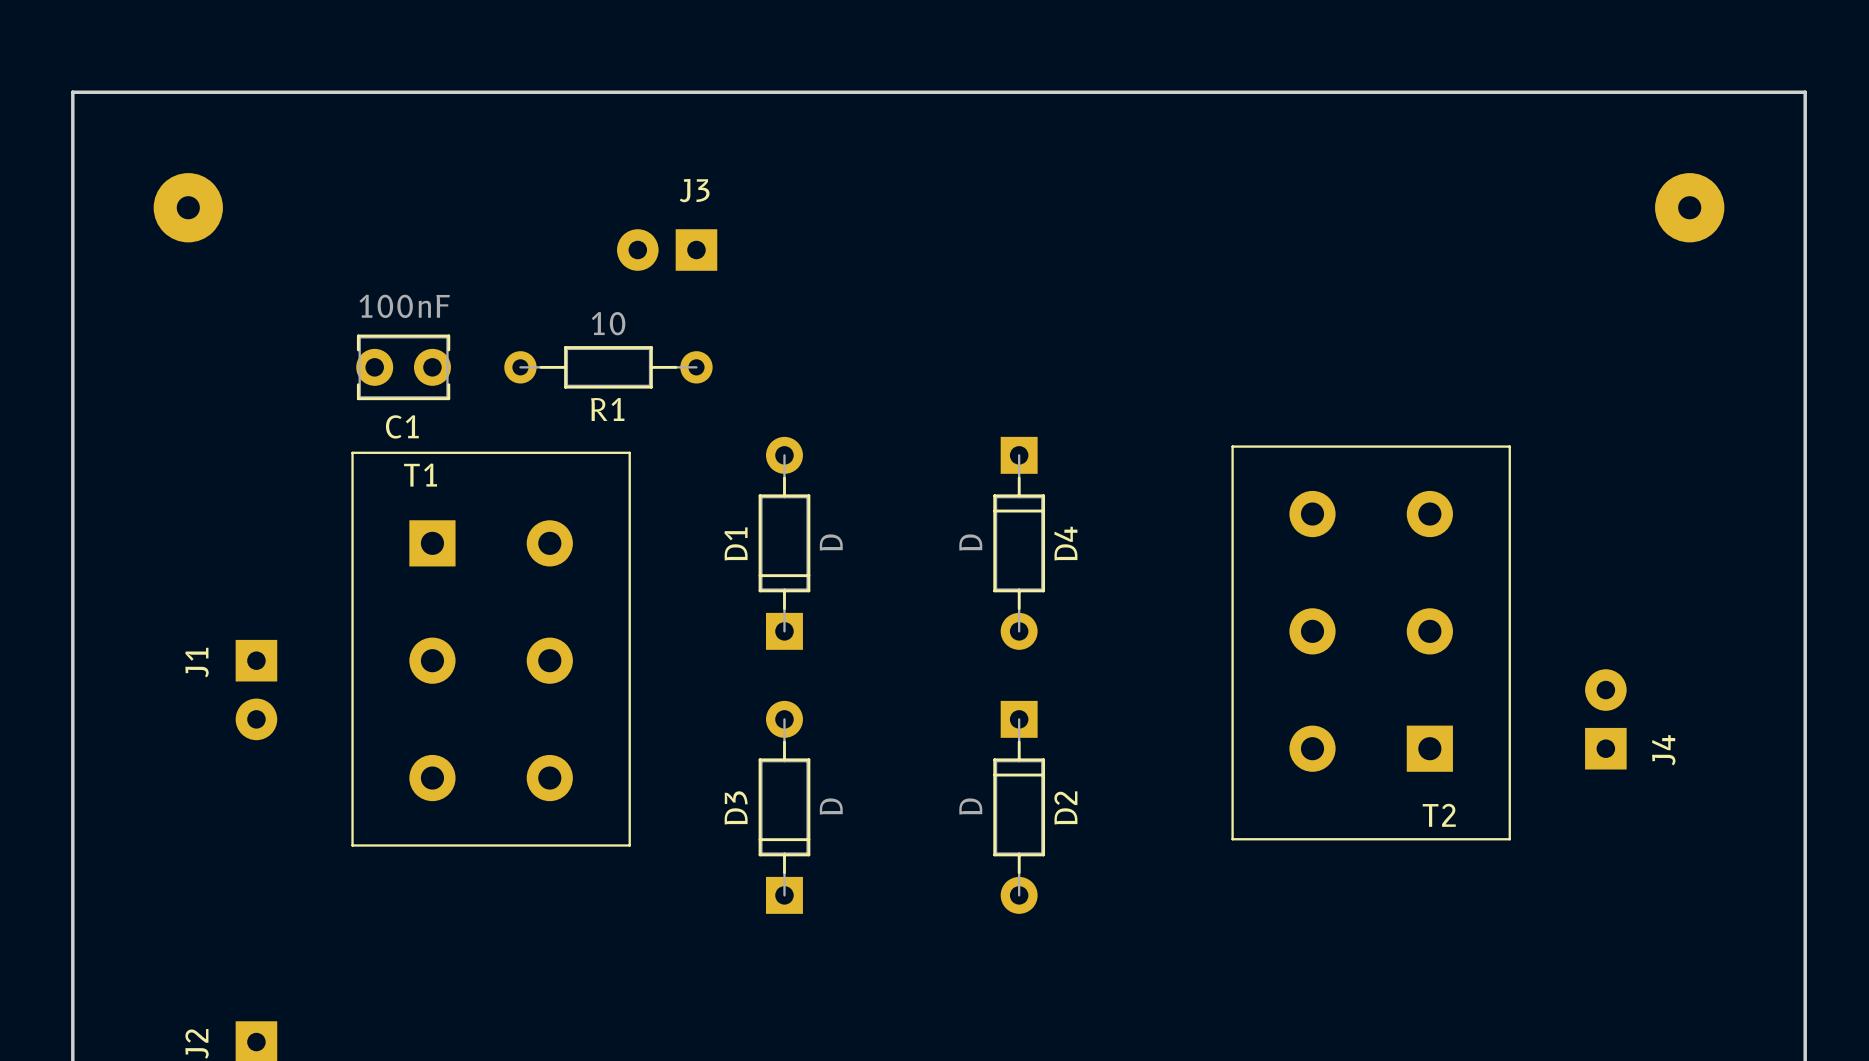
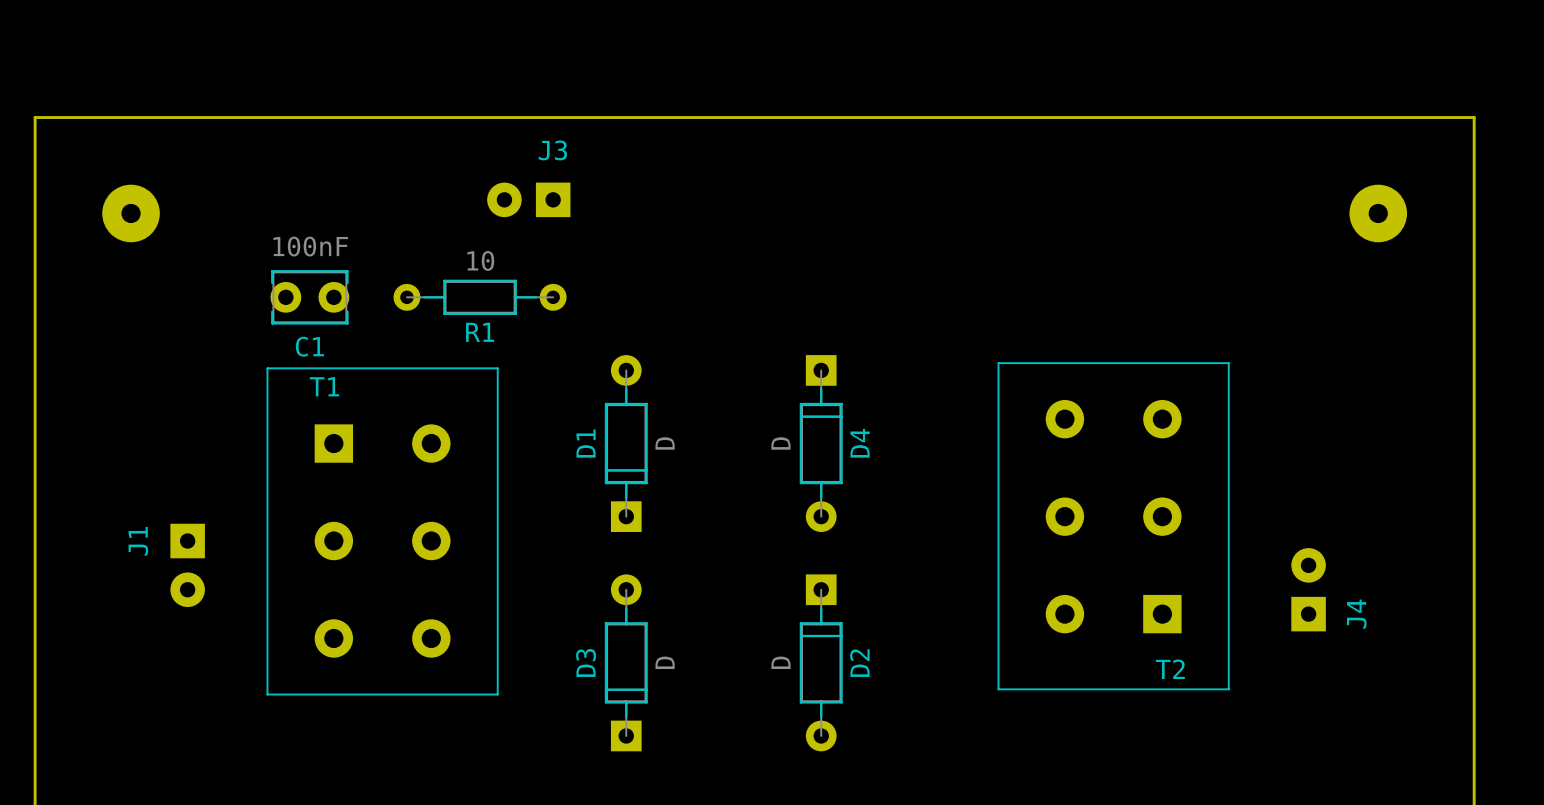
board edge: (72, 150) (72, 92) (1805, 92) (1805, 150) -> (35, 117) (1474, 117)
part position: (188, 207) -> (131, 213)
part position: (1689, 207) -> (1378, 213)

